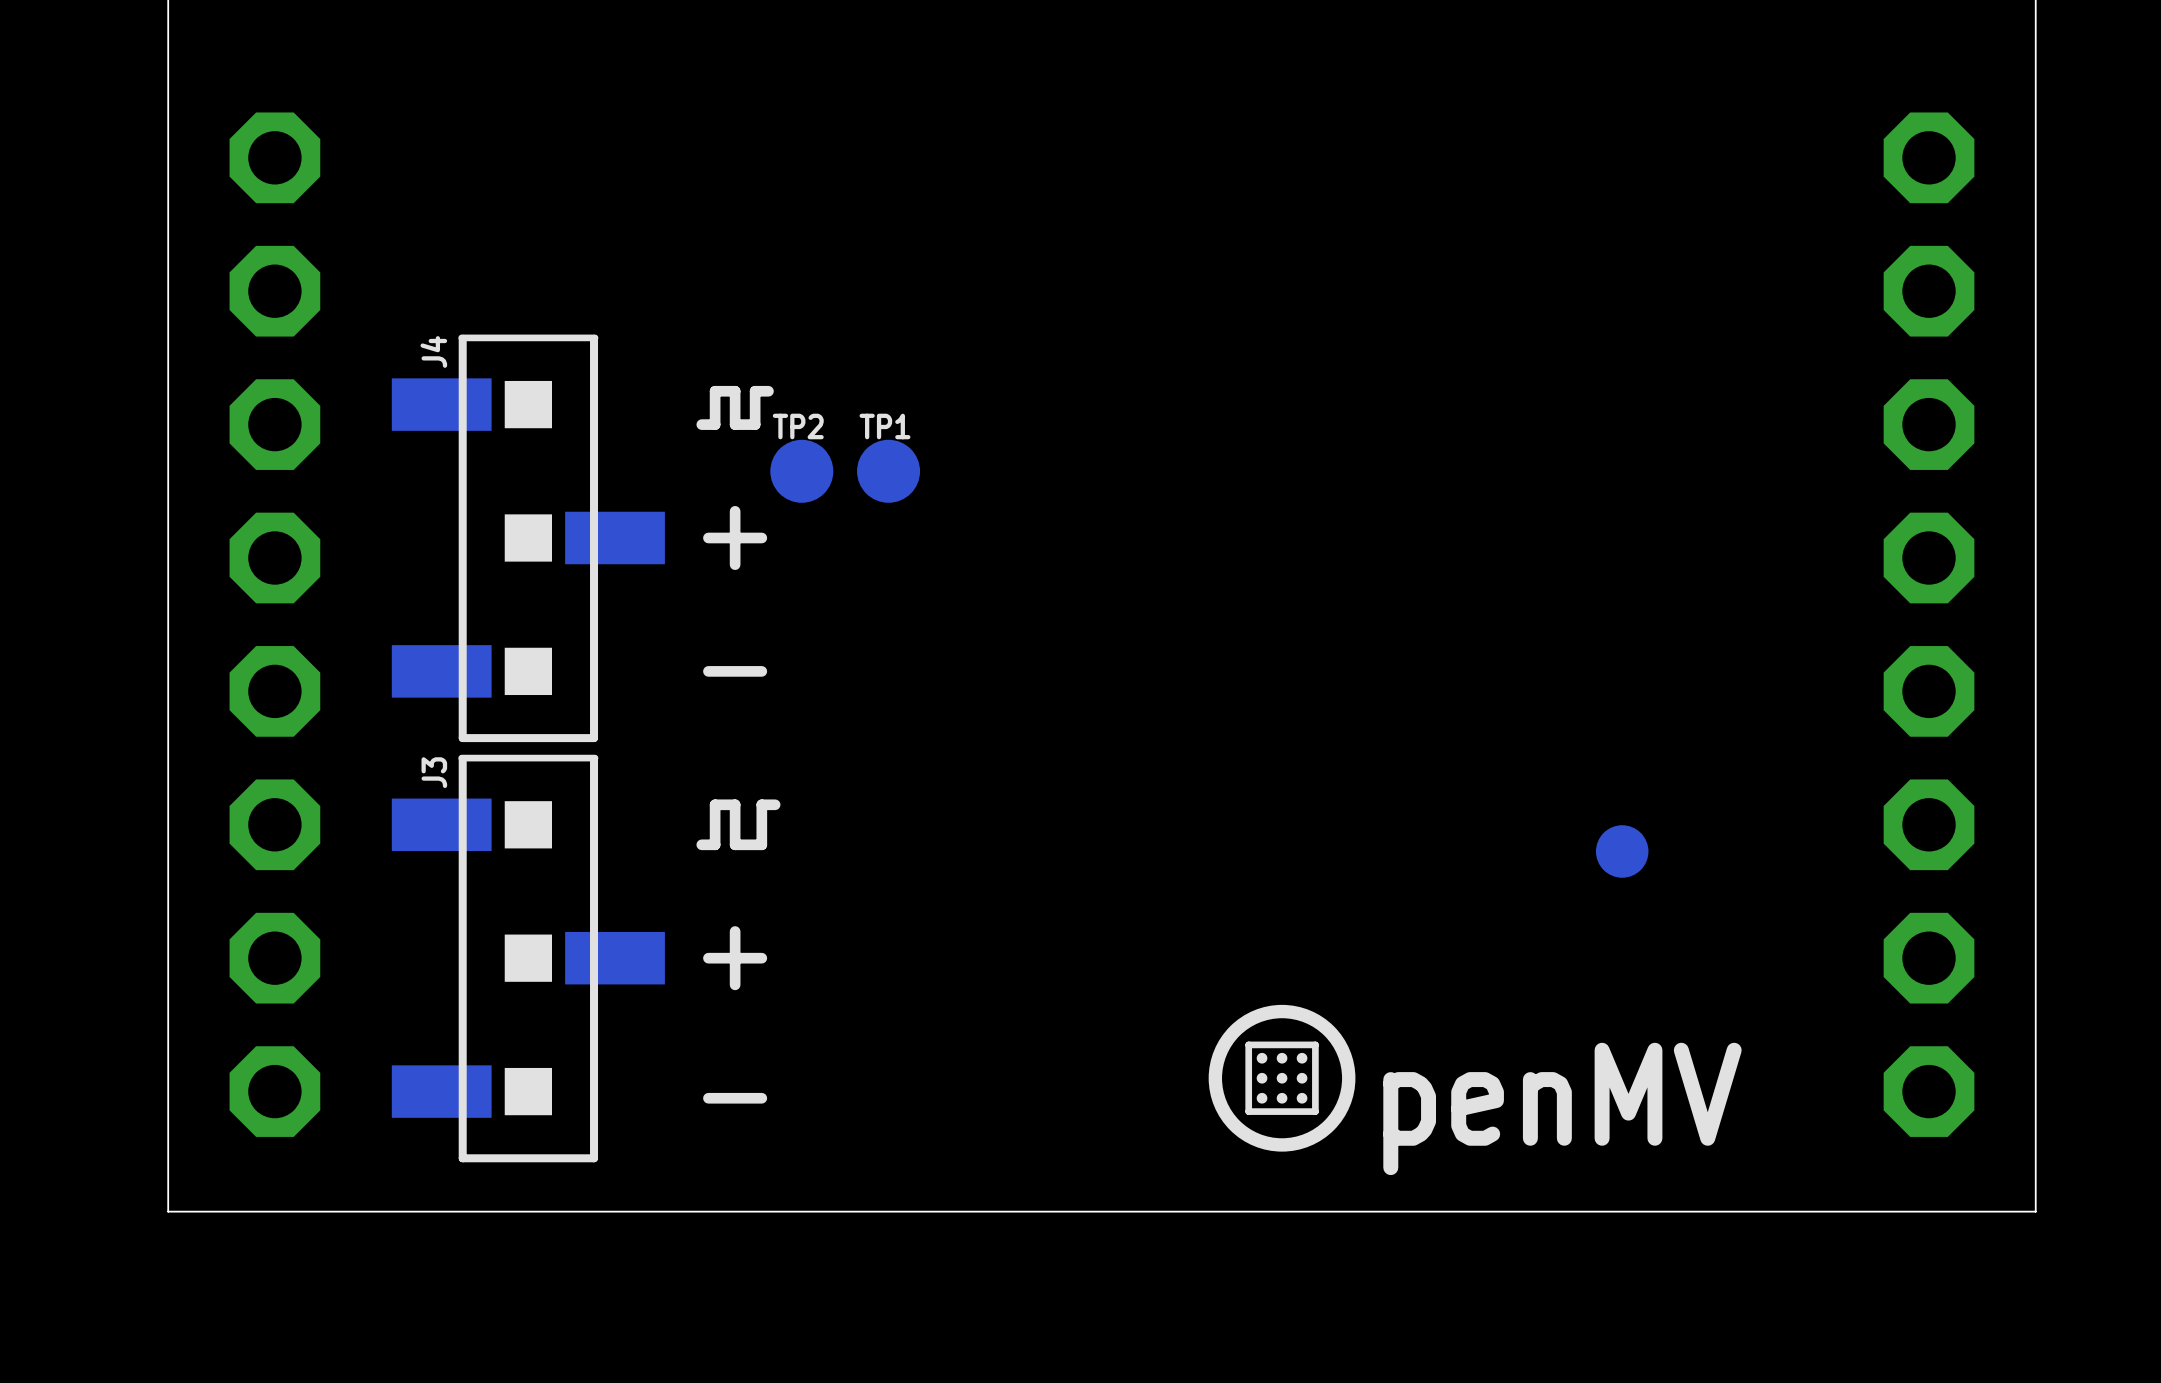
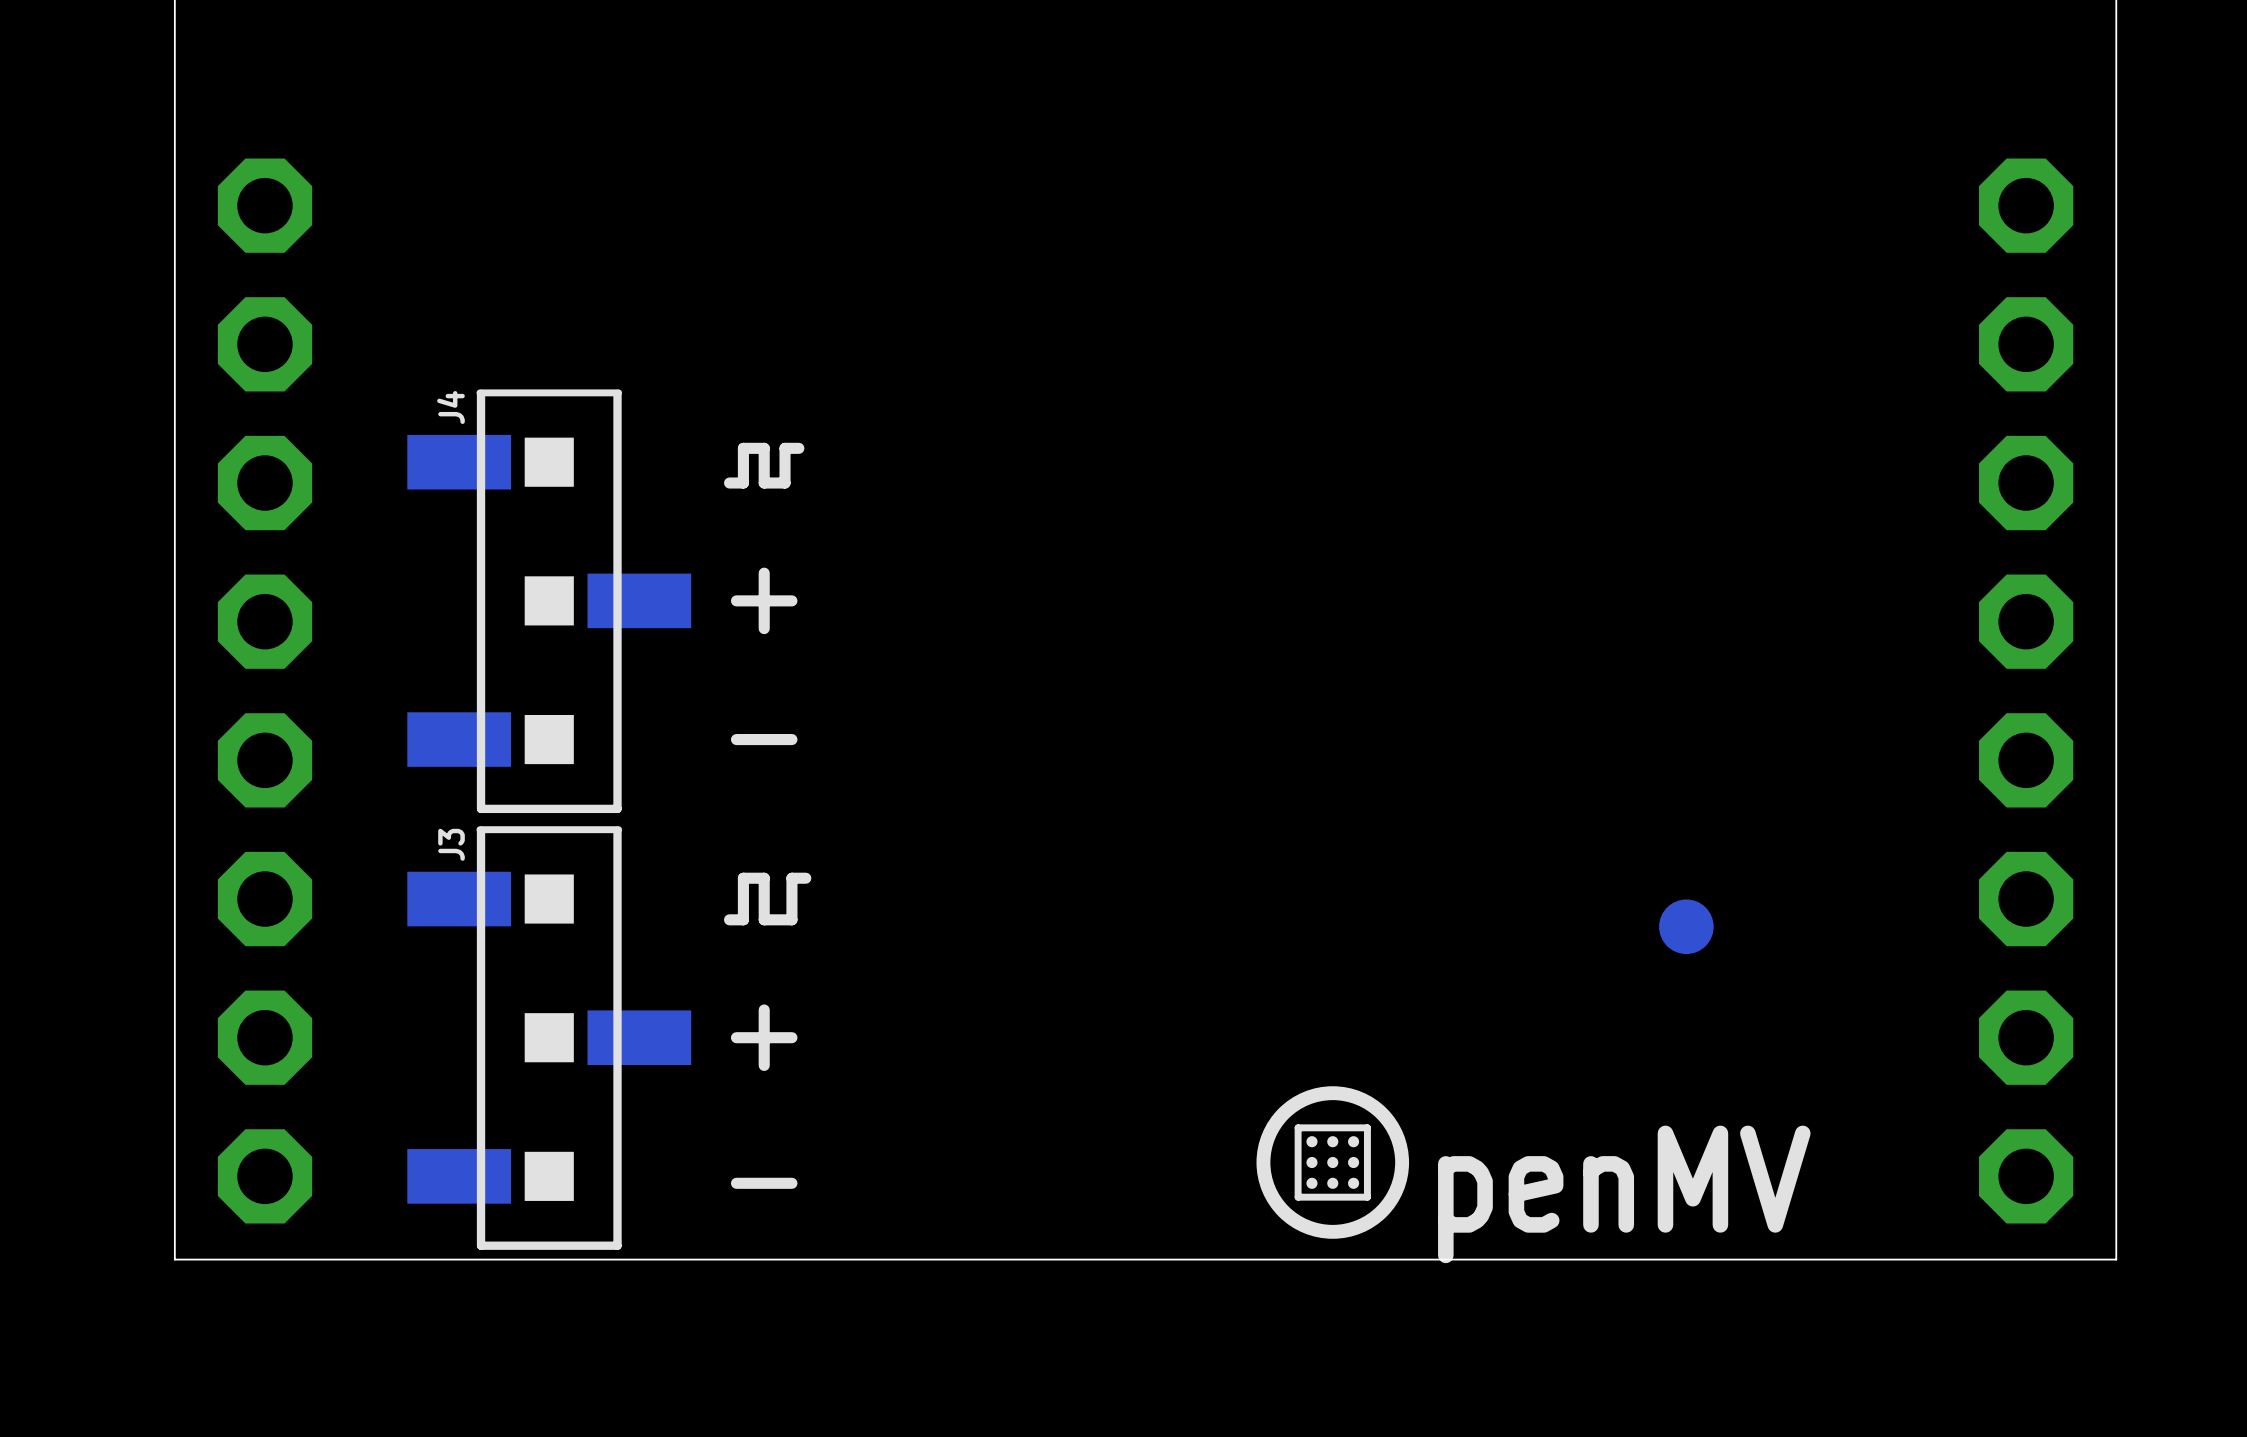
line: (768, 391) (755, 391) (755, 424) (735, 424) (735, 391) (715, 391) (715, 424) (701, 424) -> (798, 448) (785, 448) (785, 483) (764, 483) (764, 448) (743, 448) (743, 483) (729, 483)
TP2: (801, 471) -> none
TP1: (888, 471) -> none
line: (735, 511) (735, 551) -> (764, 587) (764, 628)
line: (761, 537) (708, 537) -> (791, 600) (736, 600)
J4 position: (528, 538) -> (549, 601)
part position: (274, 624) -> (264, 691)
part position: (1929, 624) -> (2026, 691)
line: (761, 671) (708, 671) -> (791, 739) (736, 739)
line: (775, 804) (761, 804) (761, 844) (735, 844) (735, 804) (715, 804) (715, 844) (701, 844) -> (805, 878) (791, 878) (791, 919) (764, 919) (764, 878) (743, 878) (743, 919) (729, 919)
part position: (1622, 851) -> (1686, 926)
line: (735, 931) (735, 971) -> (764, 1023) (764, 1065)
J3 position: (528, 958) -> (549, 1038)
line: (761, 958) (708, 958) -> (791, 1037) (736, 1037)
drawing: [1256, 1052, 1308, 1084] -> none
drawing position: (1282, 1078) -> (1332, 1162)
line: (1315, 1084) (1315, 1044) (1248, 1044) (1248, 1084) -> (1367, 1127) (1298, 1127)
line: (761, 1098) (708, 1098) -> (791, 1183) (736, 1183)
text position: penMV (1562, 1108) -> penMV (1624, 1194)
line: (1315, 1111) (1248, 1111) -> (1367, 1155) (1367, 1197) (1298, 1197) (1298, 1155)
drawing: none -> [1306, 1156, 1360, 1189]

